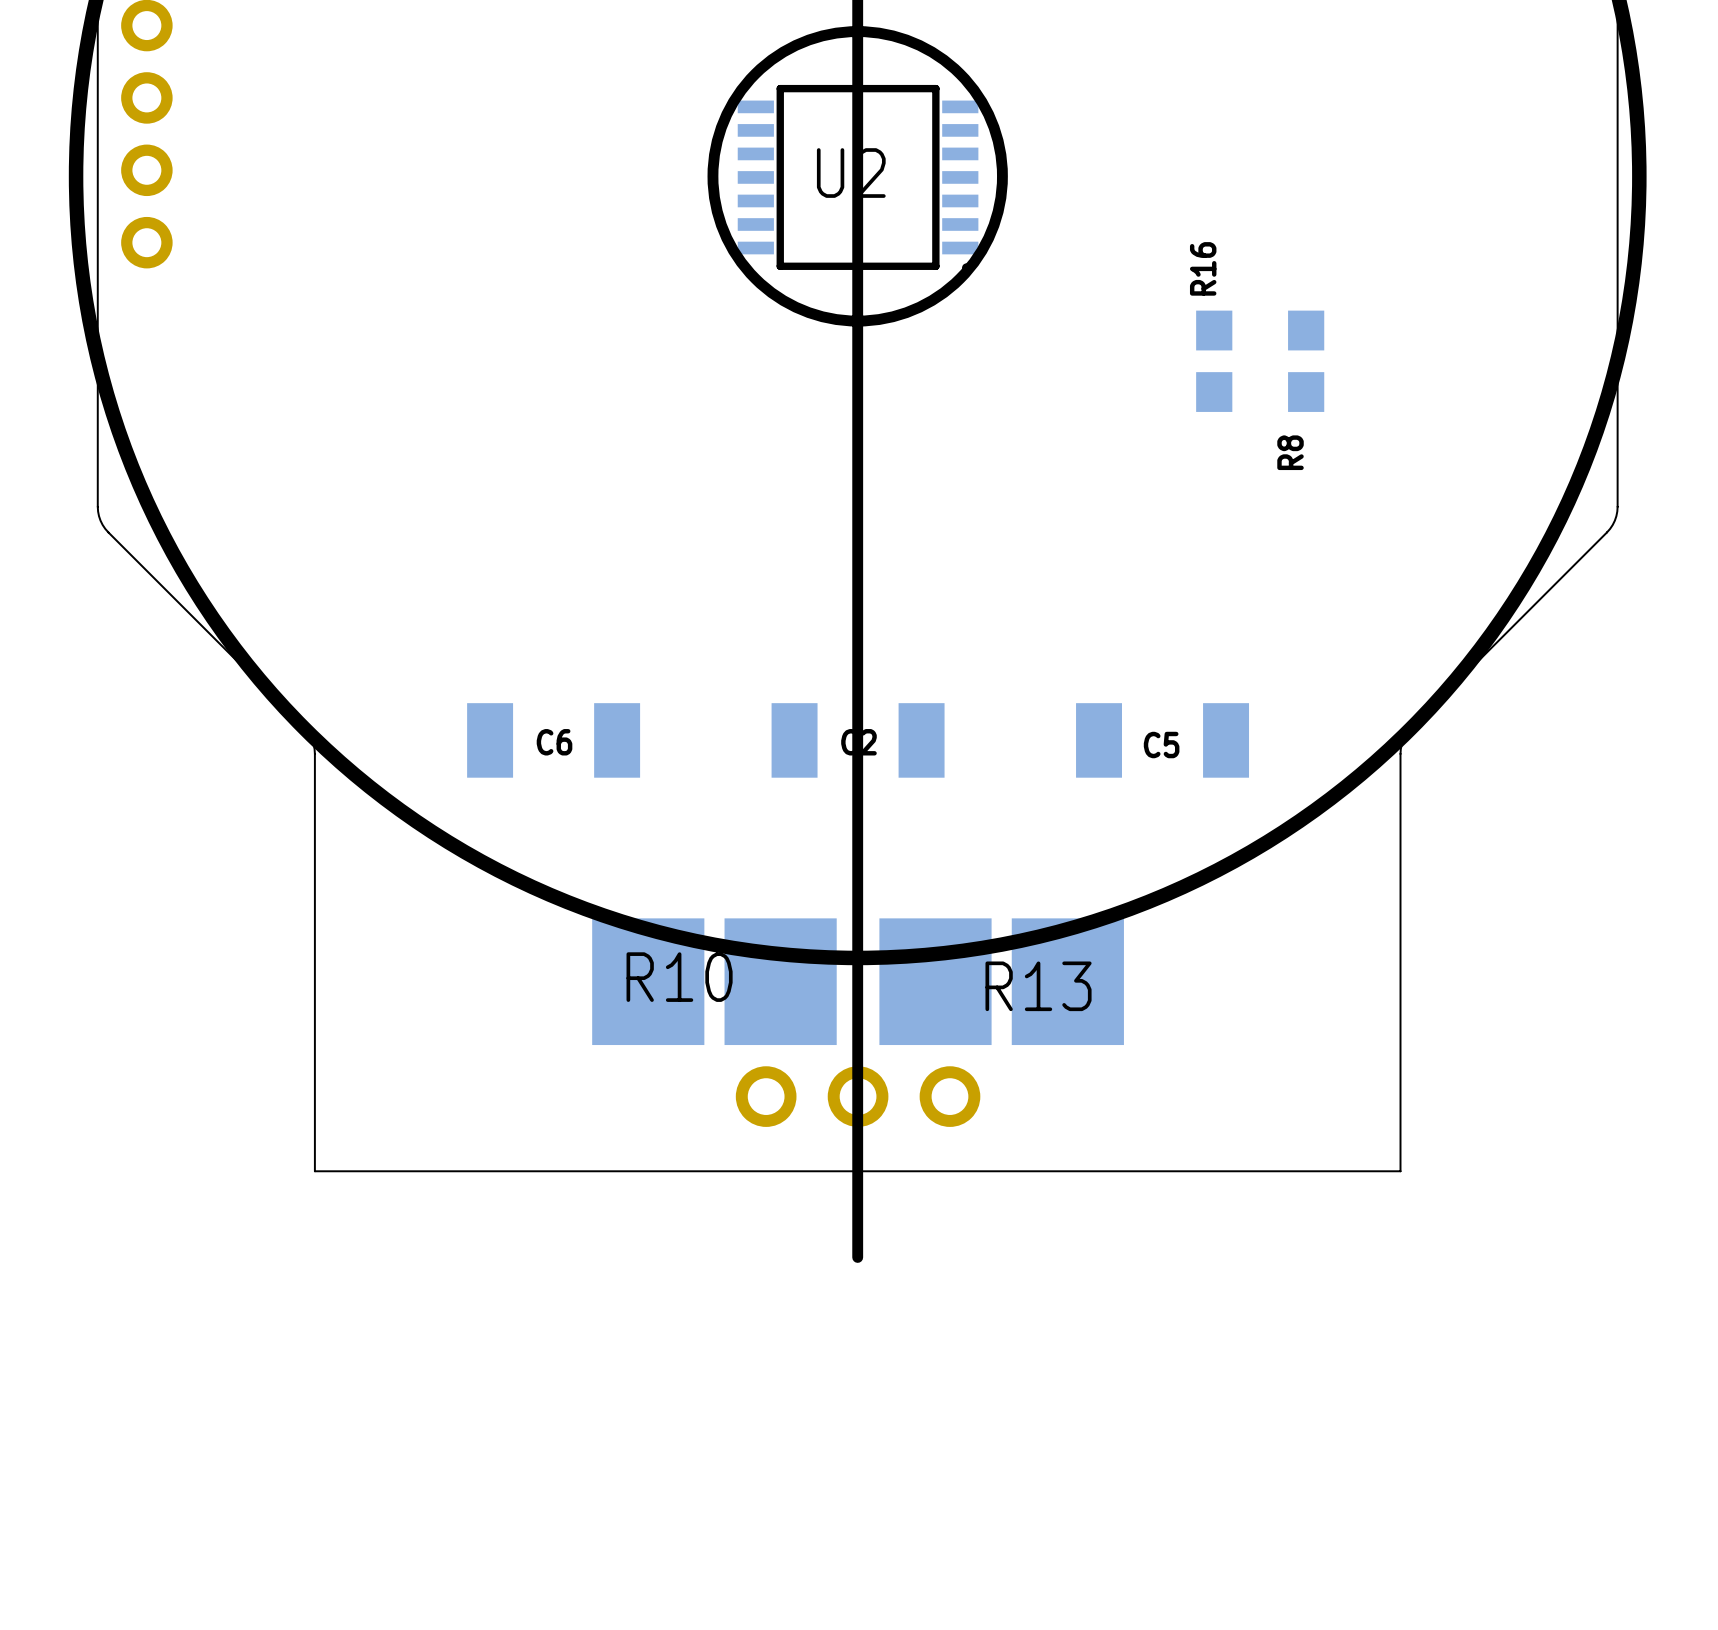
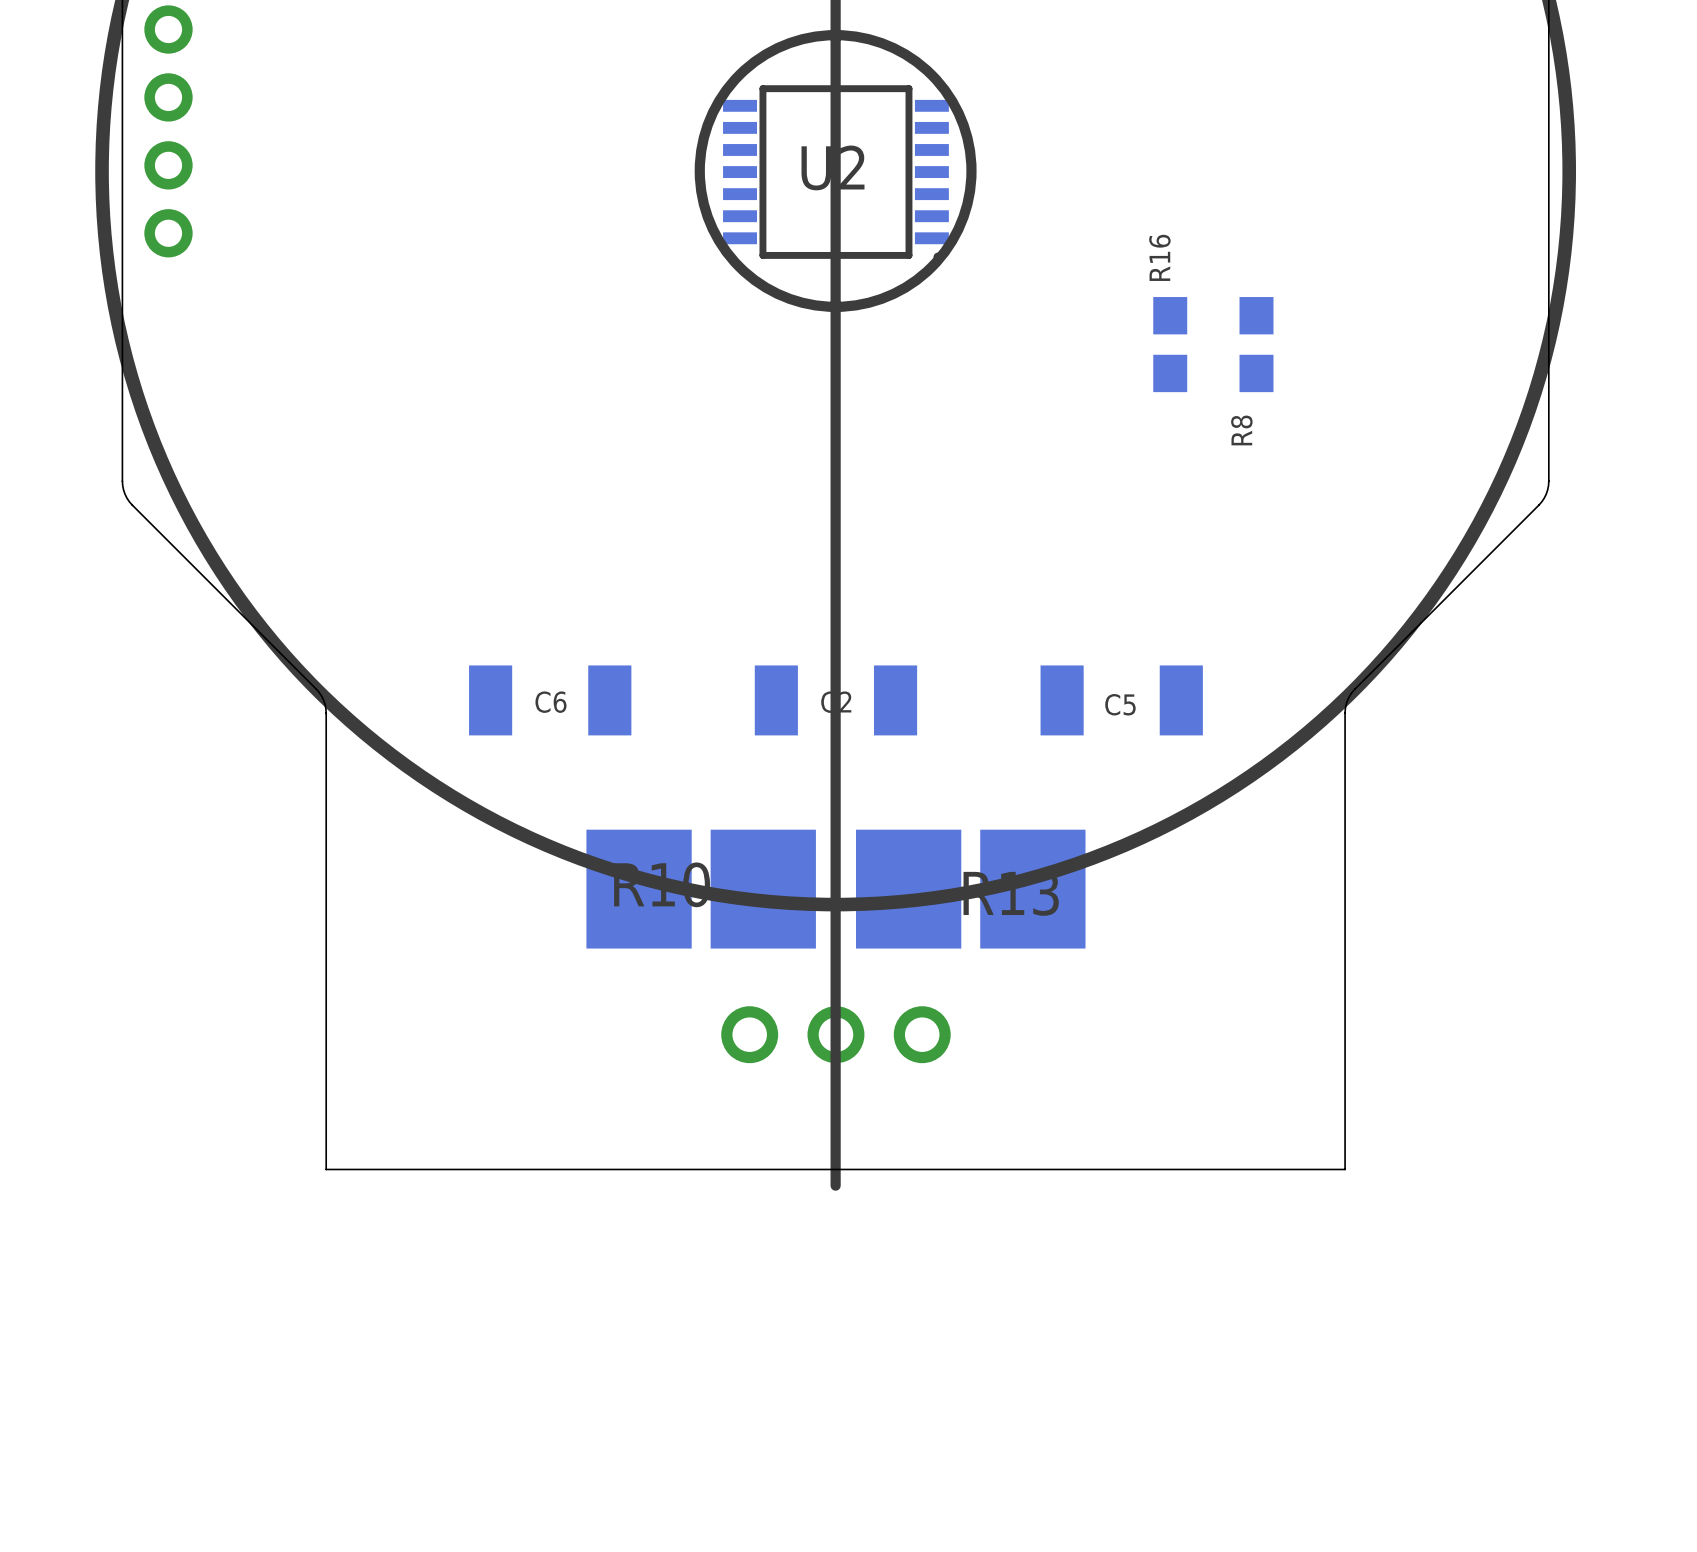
R10 position: (714, 981) -> (701, 889)
R13 position: (1001, 981) -> (970, 889)
board edge: (1400, 1171) (314, 1171) -> (1345, 1104) (1345, 1169) (326, 1169) (326, 1104)

